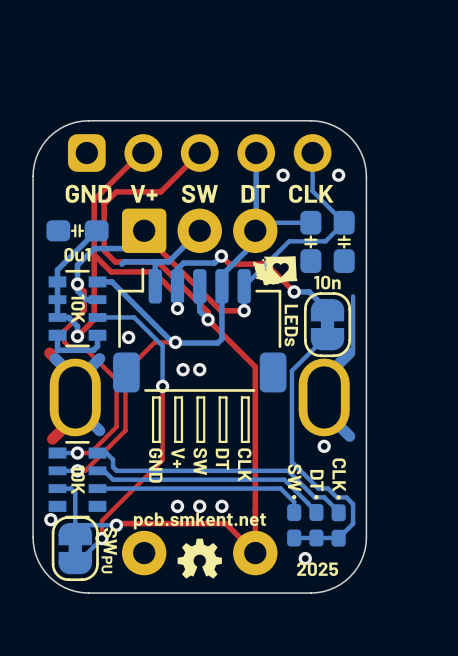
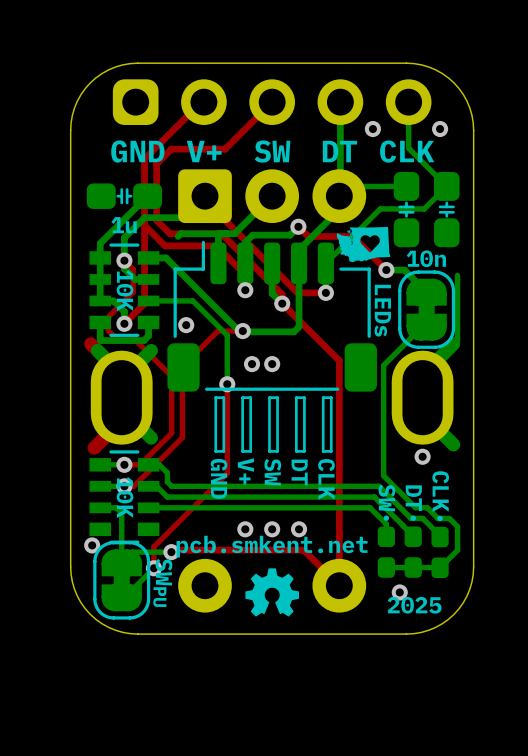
text: 0u1 (77, 254) -> 1u (124, 225)

